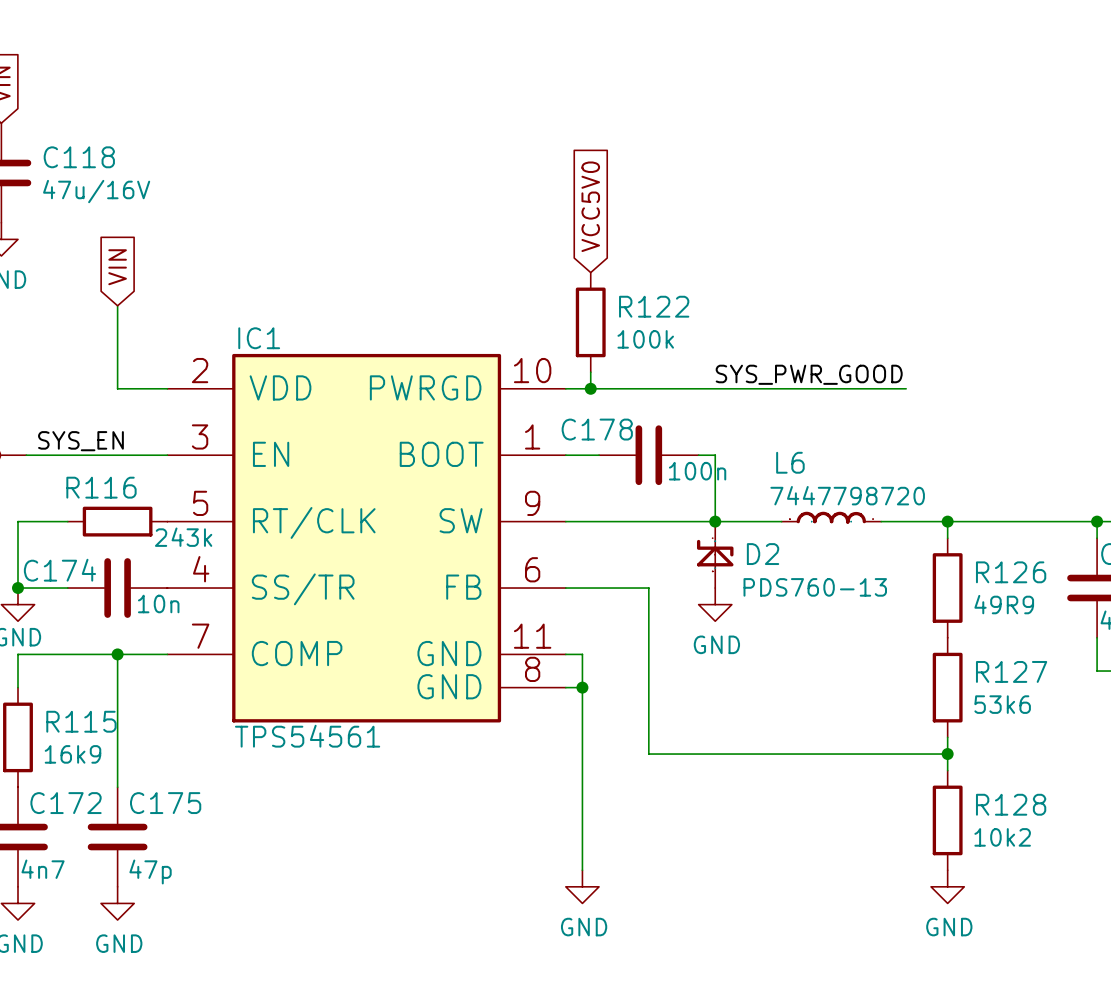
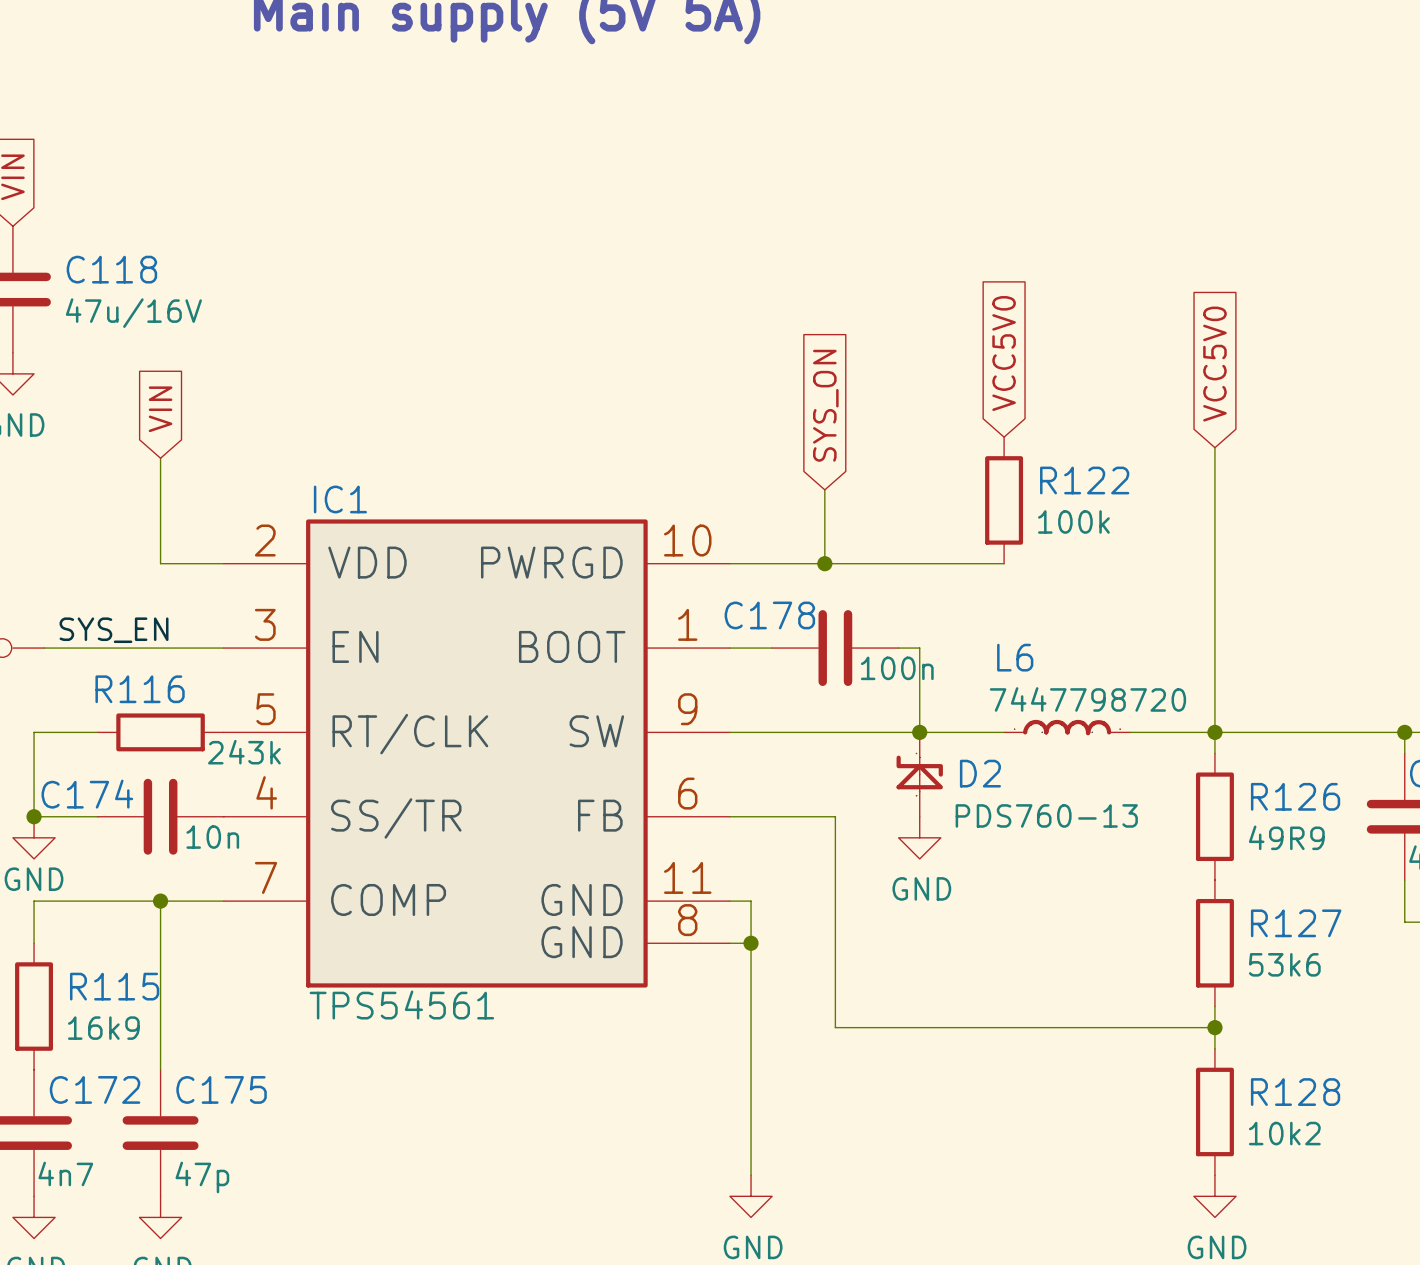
global label: VCC5V0 (590, 206) -> none
global label: none -> VCC5V0 (1004, 353)
global label: none -> VCC5V0 (1214, 364)
global label: none -> SYS_ON (825, 405)
wire: none -> (1214, 447) (1214, 732)
R122 position: (590, 322) -> (1004, 500)
wire: none -> (824, 489) (824, 563)
wire: (590, 372) (590, 388) -> none
label: SYS_PWR_GOOD (809, 374) -> none
junction position: (590, 388) -> (824, 563)
wire: (781, 388) (906, 388) -> none

